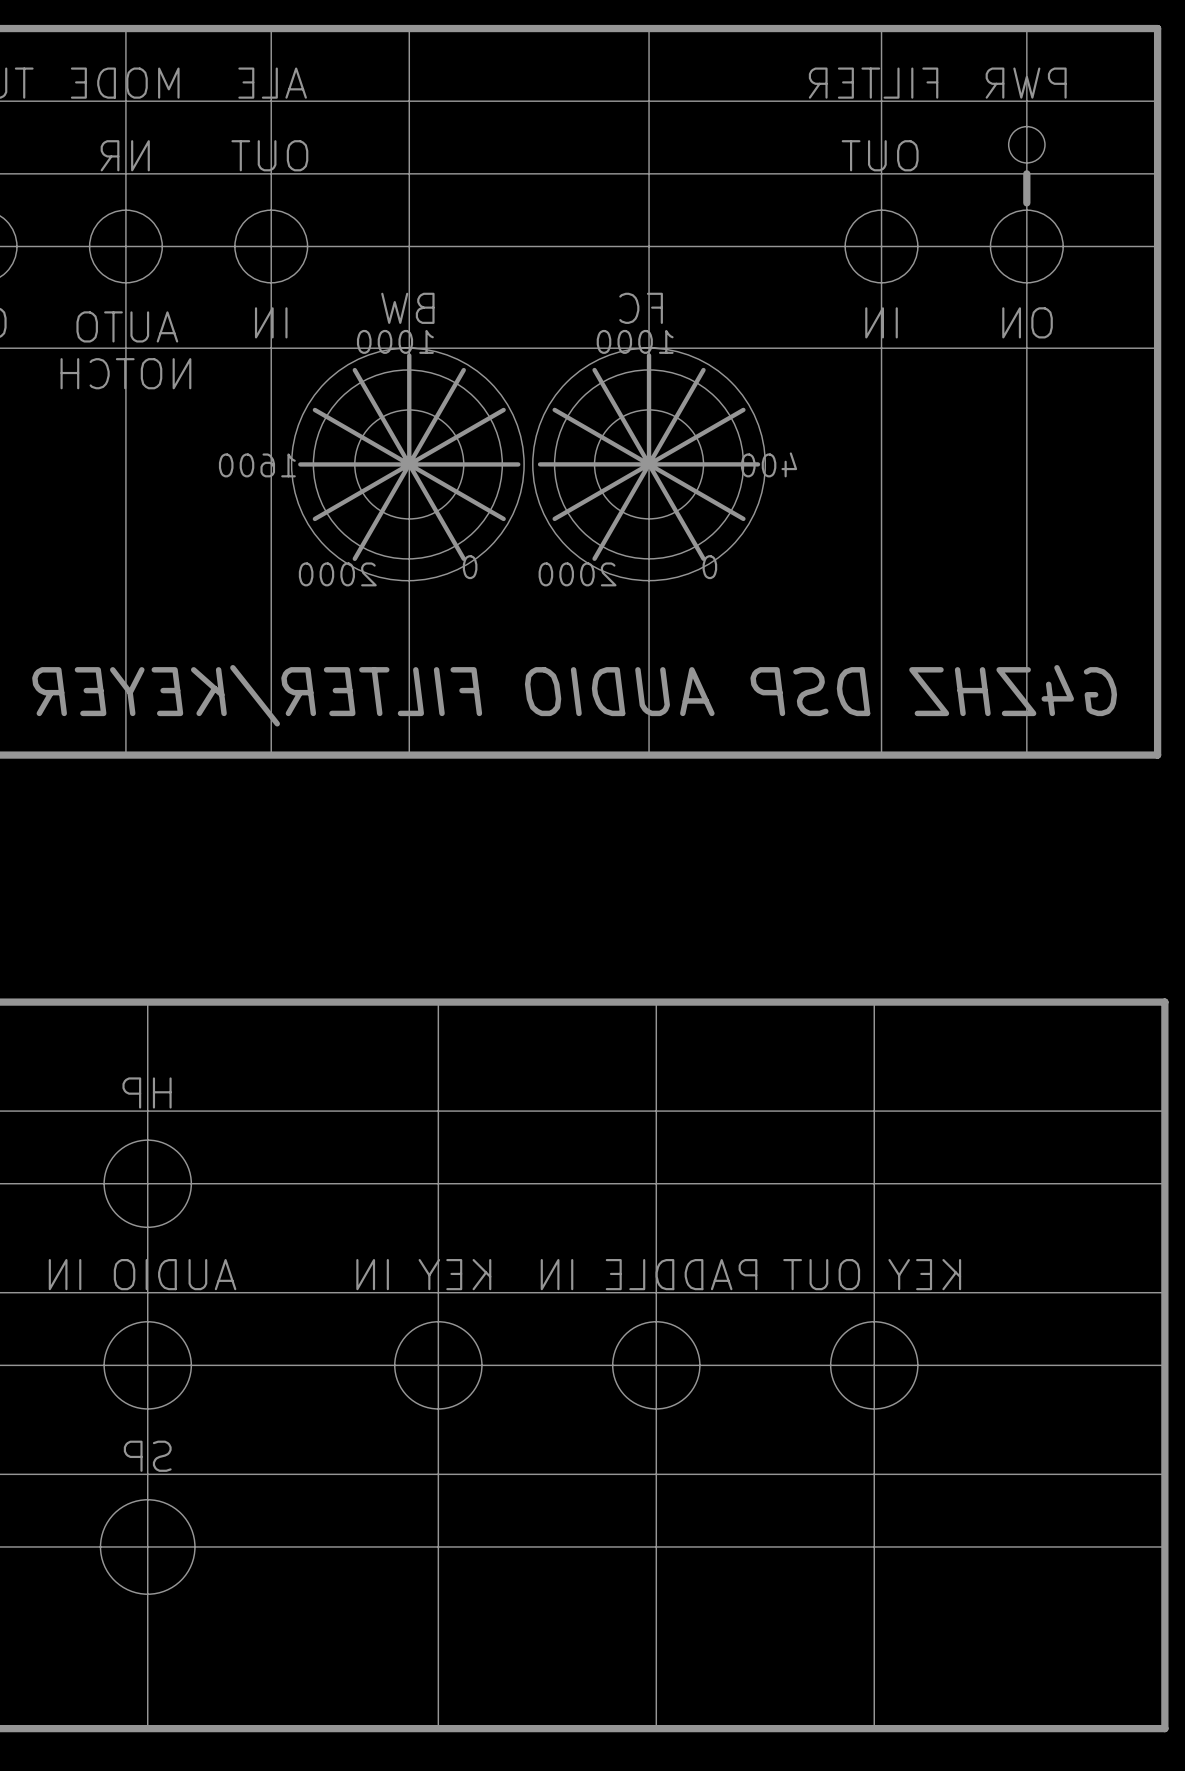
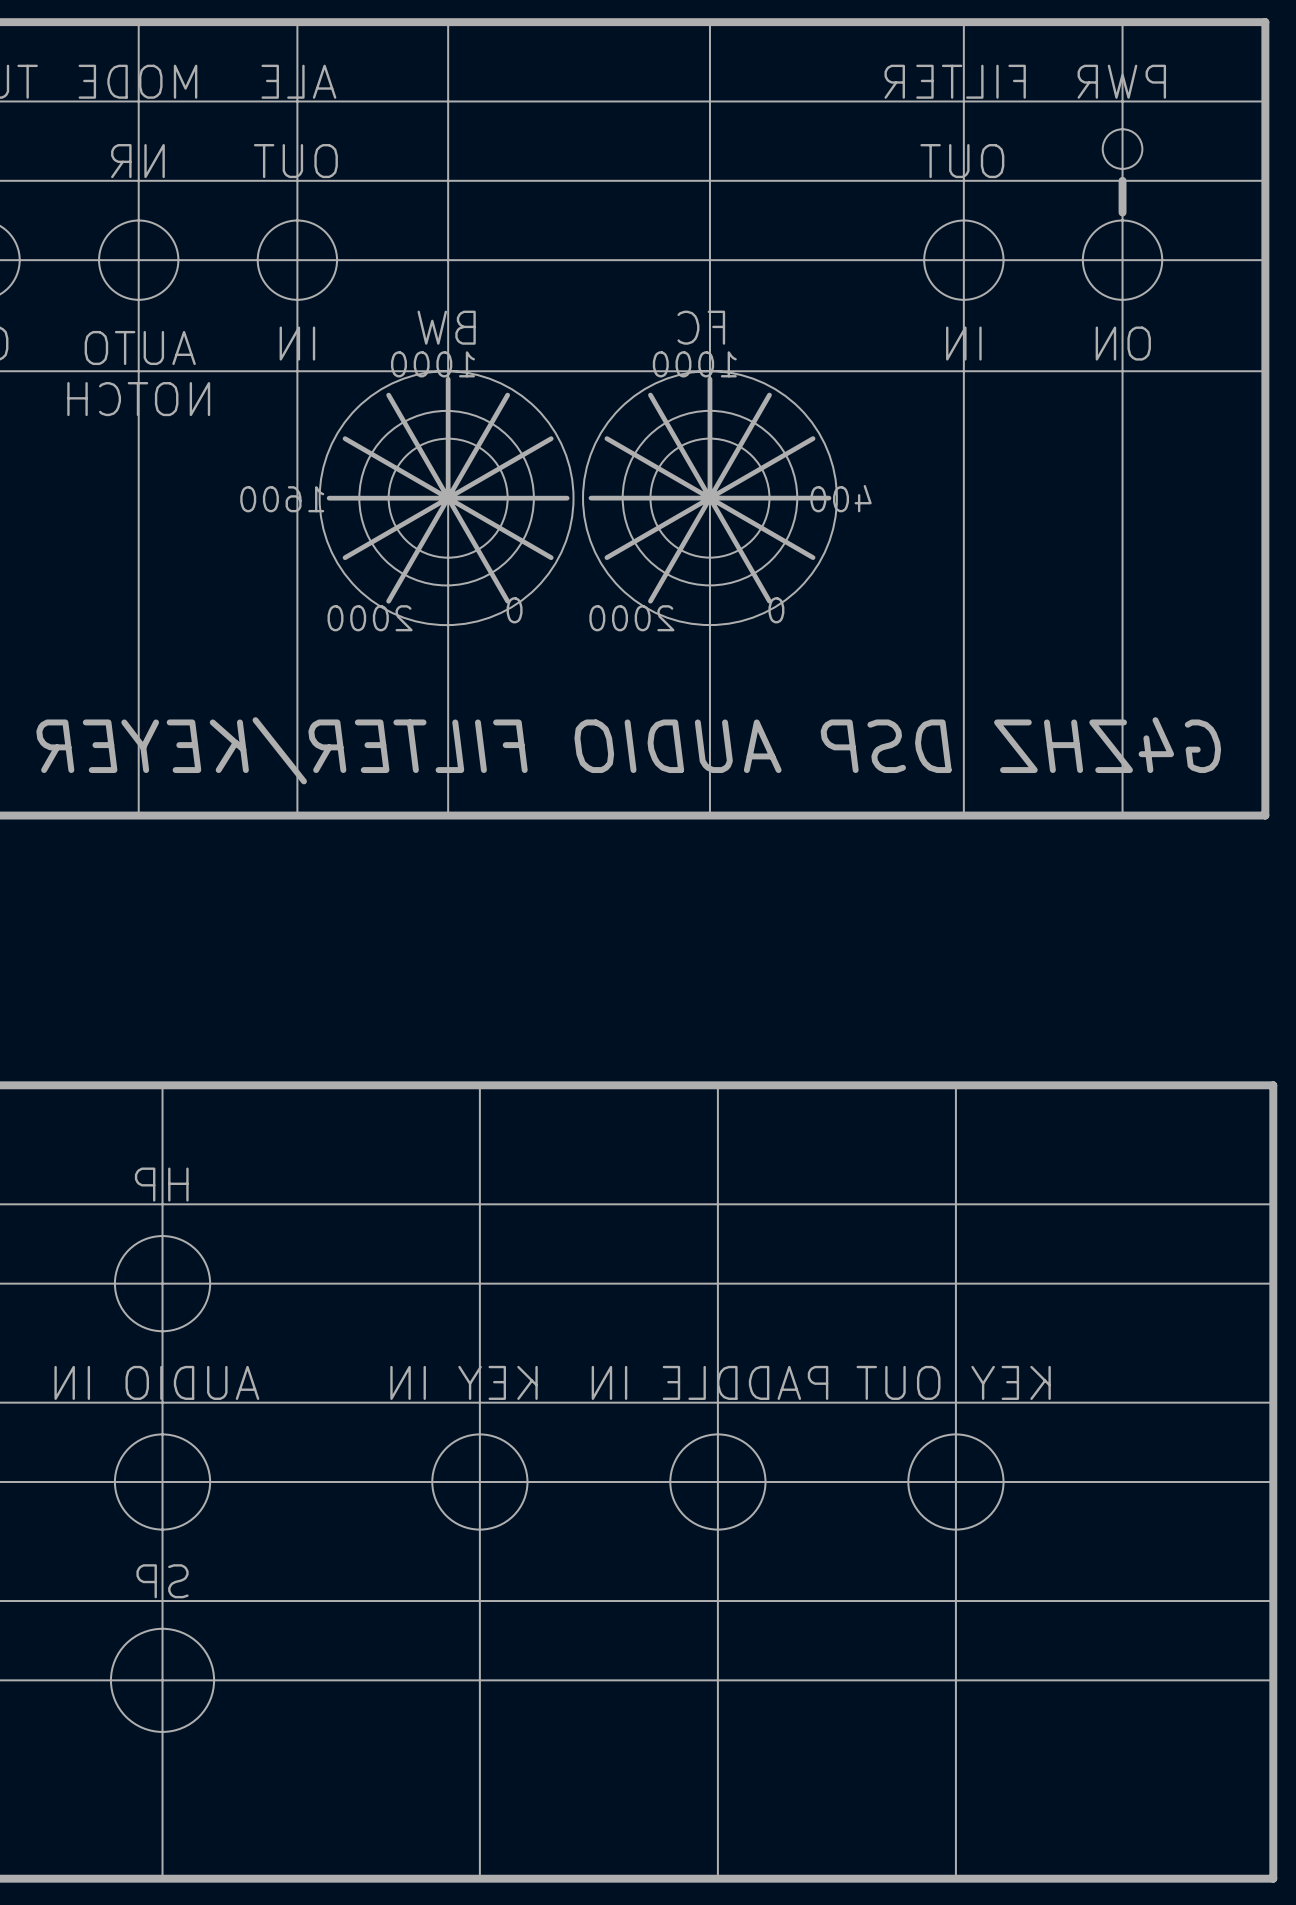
drawing shape: [312, 369, 504, 560] -> [358, 410, 535, 587]
drawing shape: [553, 369, 745, 560] -> [621, 410, 799, 587]

